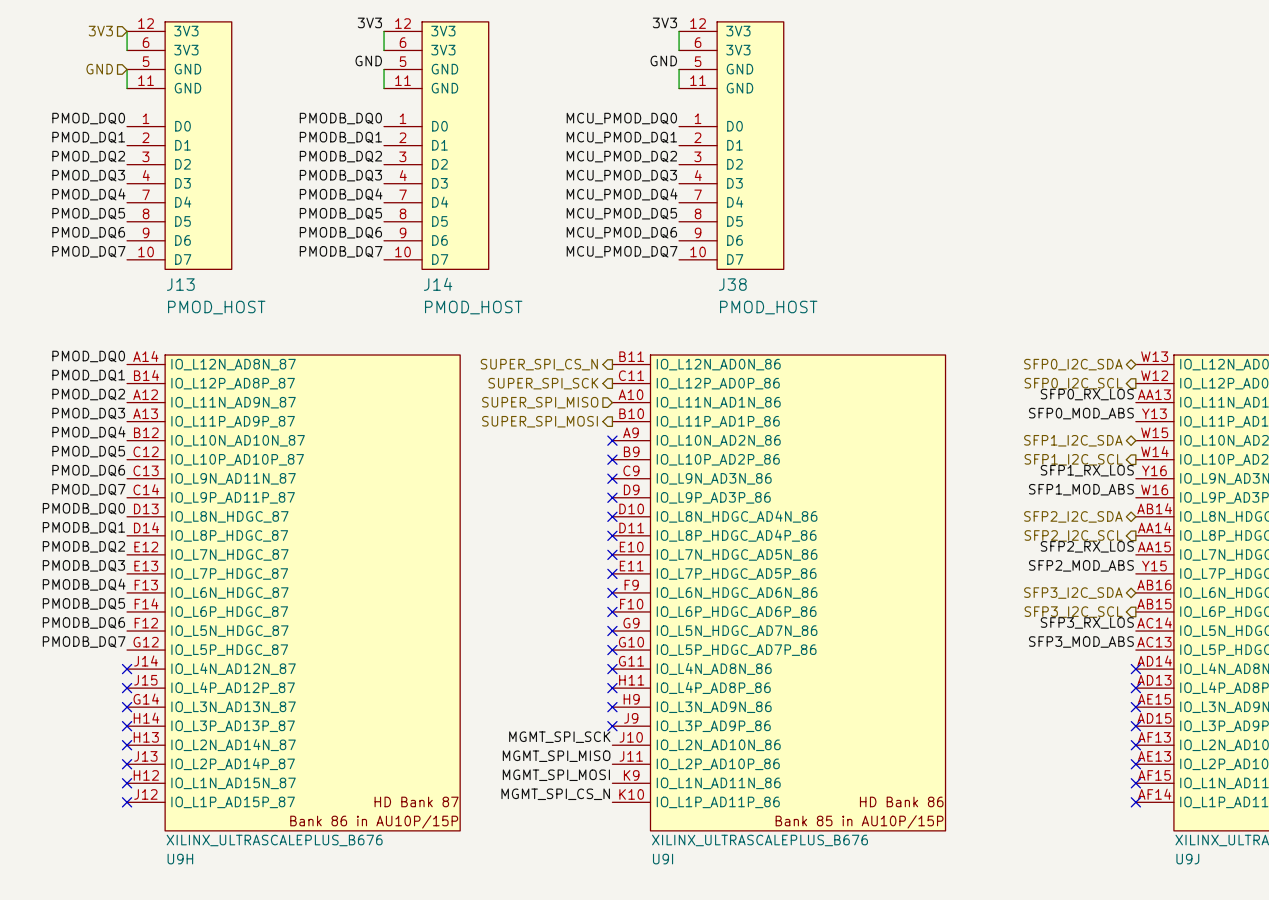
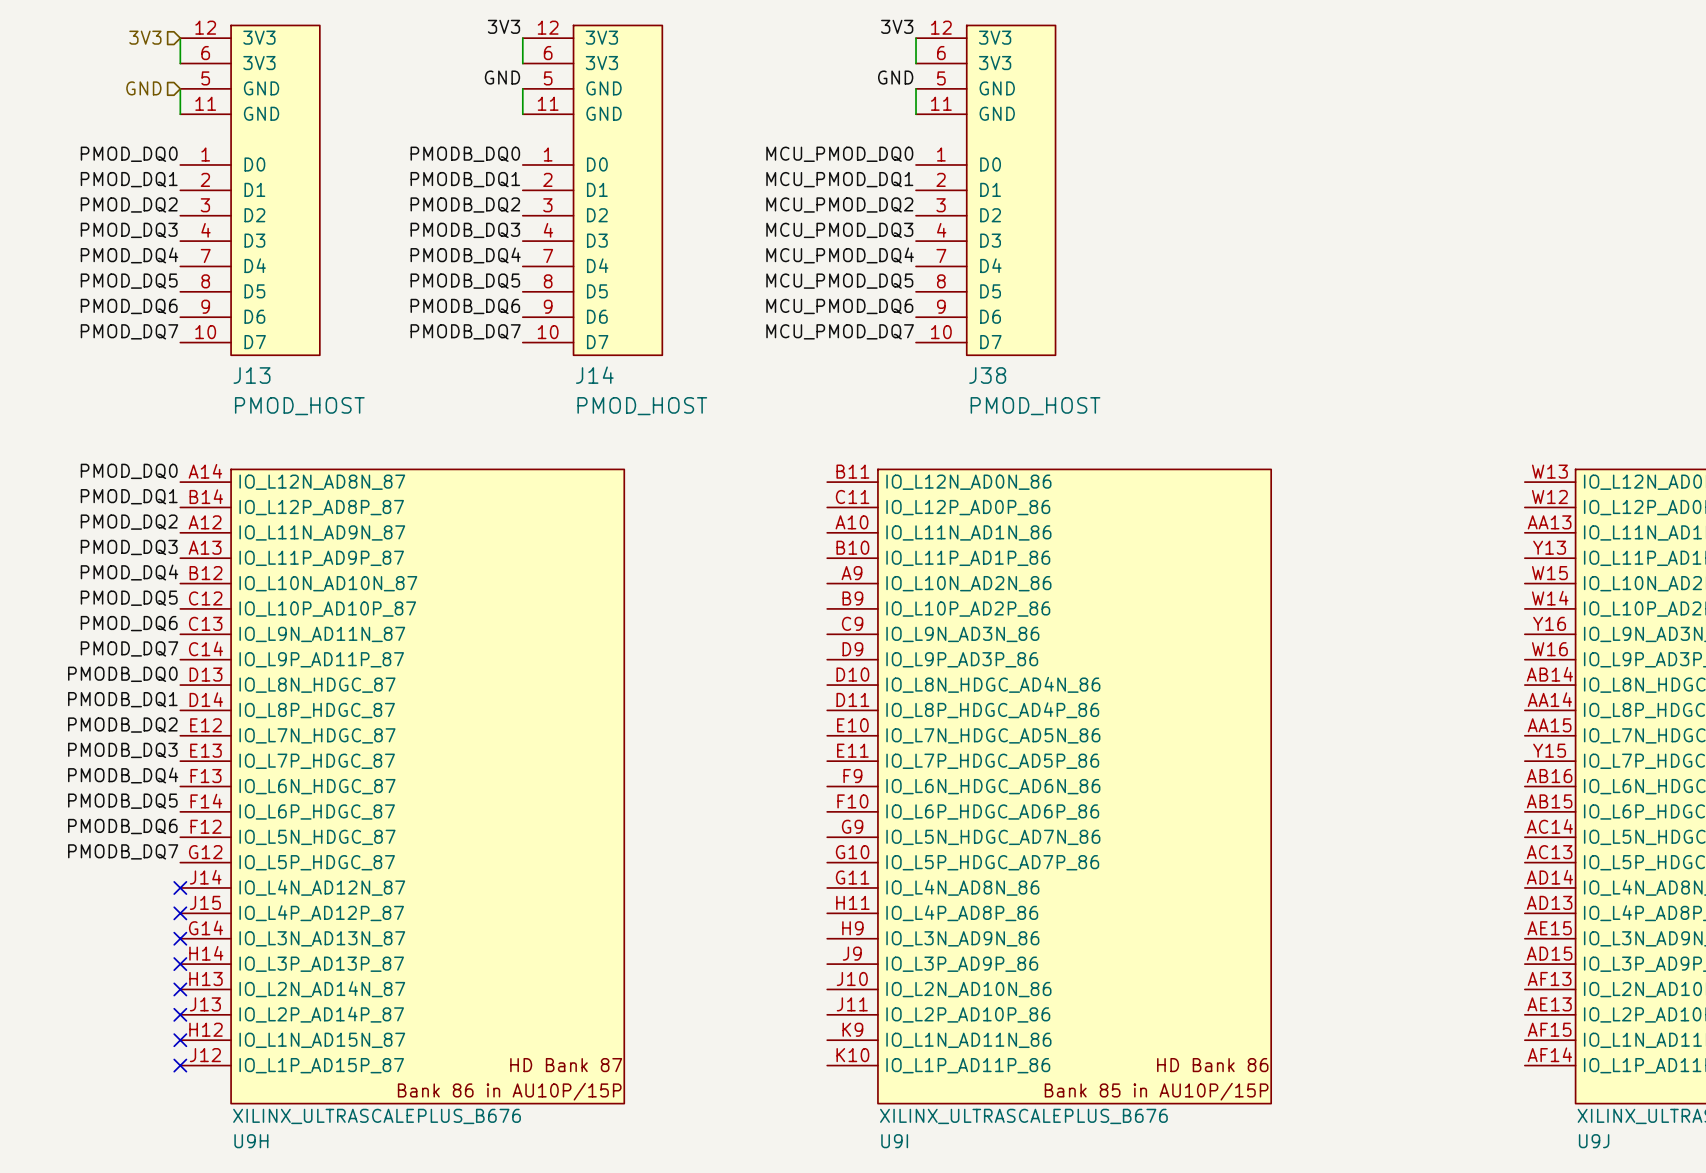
hierarchical label: SUPER_SPI_CS_N (539, 364) -> none
hierarchical label: SFP0_I2C_SDA (1073, 364) -> none
hierarchical label: SUPER_SPI_SCK (543, 383) -> none
hierarchical label: SFP0_I2C_SCL (1073, 383) -> none
label: SFP0_RX_LOS (1087, 394) -> none
hierarchical label: SUPER_SPI_MISO (540, 402) -> none
label: SFP0_MOD_ABS (1081, 413) -> none
hierarchical label: SUPER_SPI_MOSI (539, 421) -> none
no-connect mark: (612, 440) -> none
hierarchical label: SFP1_I2C_SDA (1073, 440) -> none
no-connect mark: (612, 459) -> none
hierarchical label: SFP1_I2C_SCL (1073, 459) -> none
label: SFP1_RX_LOS (1087, 470) -> none
no-connect mark: (612, 478) -> none
label: SFP1_MOD_ABS (1081, 489) -> none
no-connect mark: (612, 497) -> none
no-connect mark: (612, 516) -> none
hierarchical label: SFP2_I2C_SDA (1073, 516) -> none
no-connect mark: (612, 535) -> none
hierarchical label: SFP2_I2C_SCL (1073, 535) -> none
label: SFP2_RX_LOS (1087, 546) -> none
no-connect mark: (612, 554) -> none
label: SFP2_MOD_ABS (1081, 565) -> none
no-connect mark: (612, 573) -> none
no-connect mark: (612, 592) -> none
hierarchical label: SFP3_I2C_SDA (1073, 593) -> none
no-connect mark: (612, 611) -> none
hierarchical label: SFP3_I2C_SCL (1073, 612) -> none
label: SFP3_RX_LOS (1087, 622) -> none
no-connect mark: (612, 631) -> none
label: SFP3_MOD_ABS (1081, 642) -> none
no-connect mark: (612, 650) -> none
no-connect mark: (612, 669) -> none
no-connect mark: (1135, 669) -> none
no-connect mark: (612, 688) -> none
no-connect mark: (1135, 688) -> none
no-connect mark: (612, 707) -> none
no-connect mark: (1135, 707) -> none
no-connect mark: (612, 726) -> none
no-connect mark: (1135, 726) -> none
label: MGMT_SPI_SCK (559, 737) -> none
no-connect mark: (1135, 745) -> none
label: MGMT_SPI_MISO (556, 756) -> none
no-connect mark: (1135, 764) -> none
label: MGMT_SPI_MOSI (556, 775) -> none
no-connect mark: (1135, 783) -> none
label: MGMT_SPI_CS_N (555, 794) -> none
no-connect mark: (1135, 802) -> none

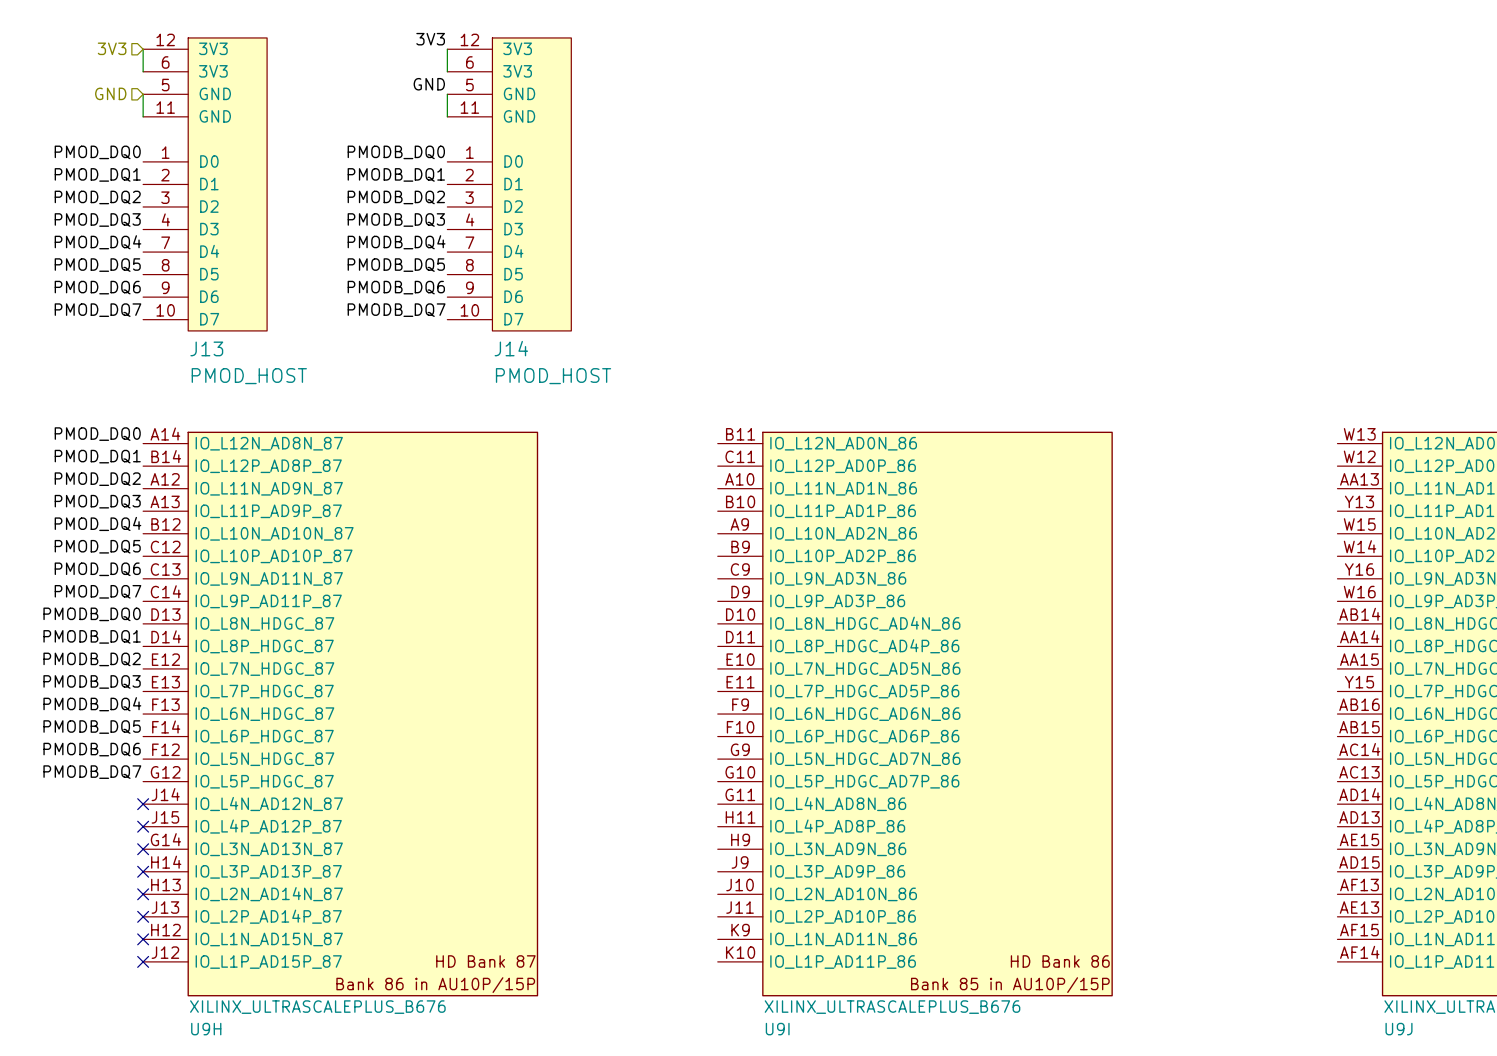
label: 3V3 (897, 26) -> none
wire: (916, 38) (916, 63) -> none
label: GND (895, 77) -> none
wire: (916, 88) (916, 114) -> none
label: MCU_PMOD_DQ0 (839, 154) -> none
label: MCU_PMOD_DQ1 (839, 179) -> none
J38: PMOD_HOST (985, 190) -> none
label: MCU_PMOD_DQ2 (839, 205) -> none
label: MCU_PMOD_DQ3 (839, 230) -> none
label: MCU_PMOD_DQ4 (840, 255) -> none
label: MCU_PMOD_DQ5 (839, 281) -> none
label: MCU_PMOD_DQ6 (839, 306) -> none
label: MCU_PMOD_DQ7 (840, 331) -> none

